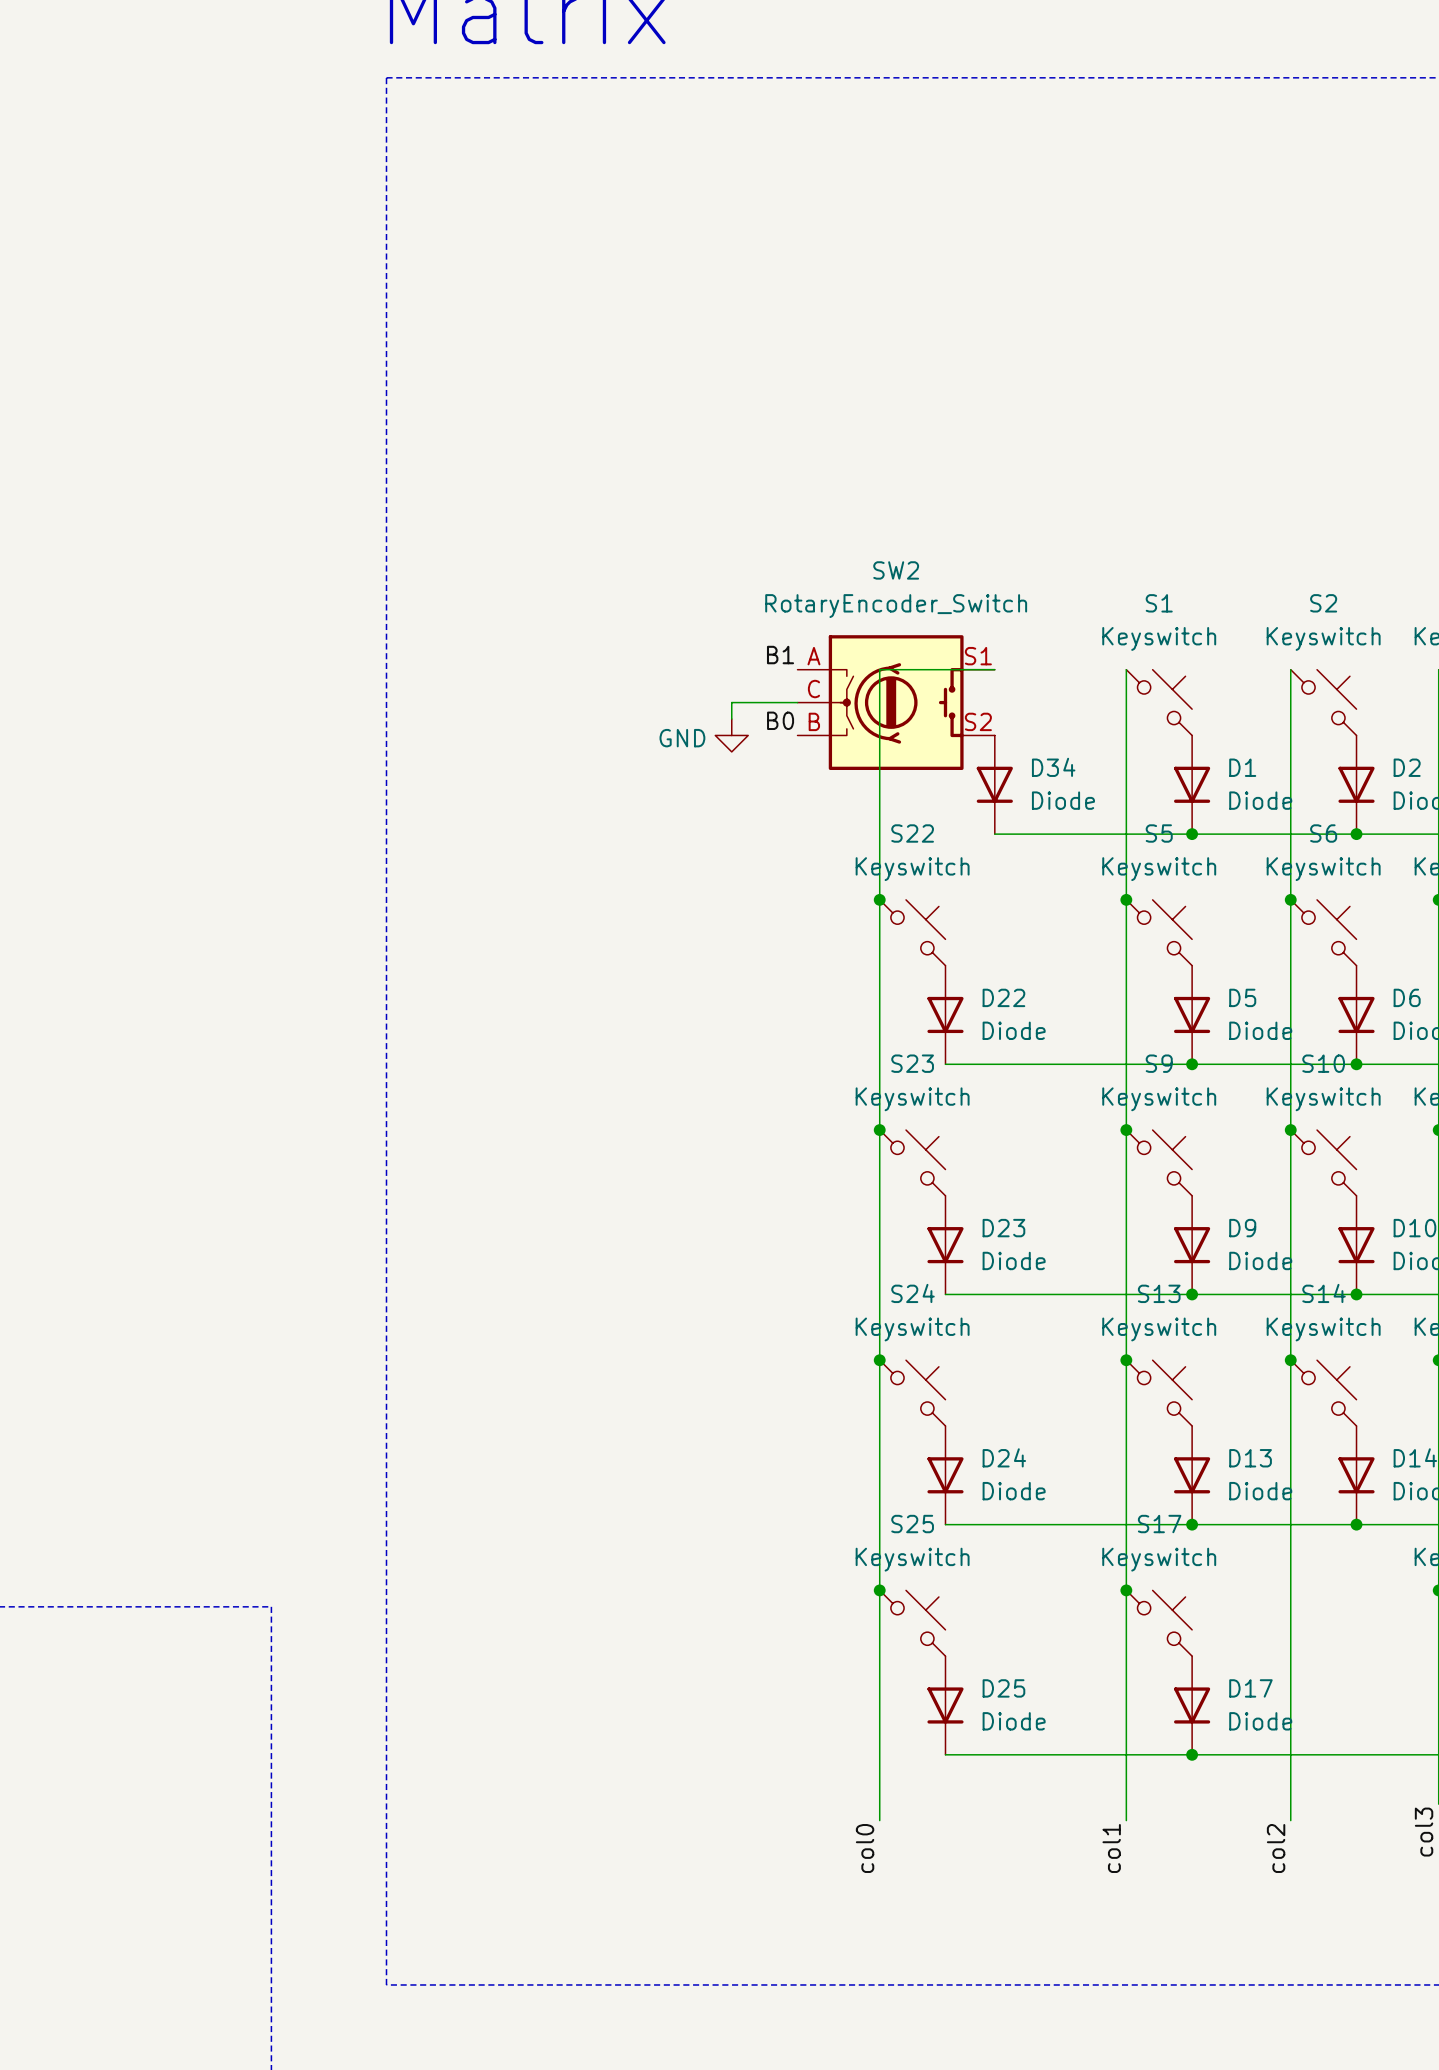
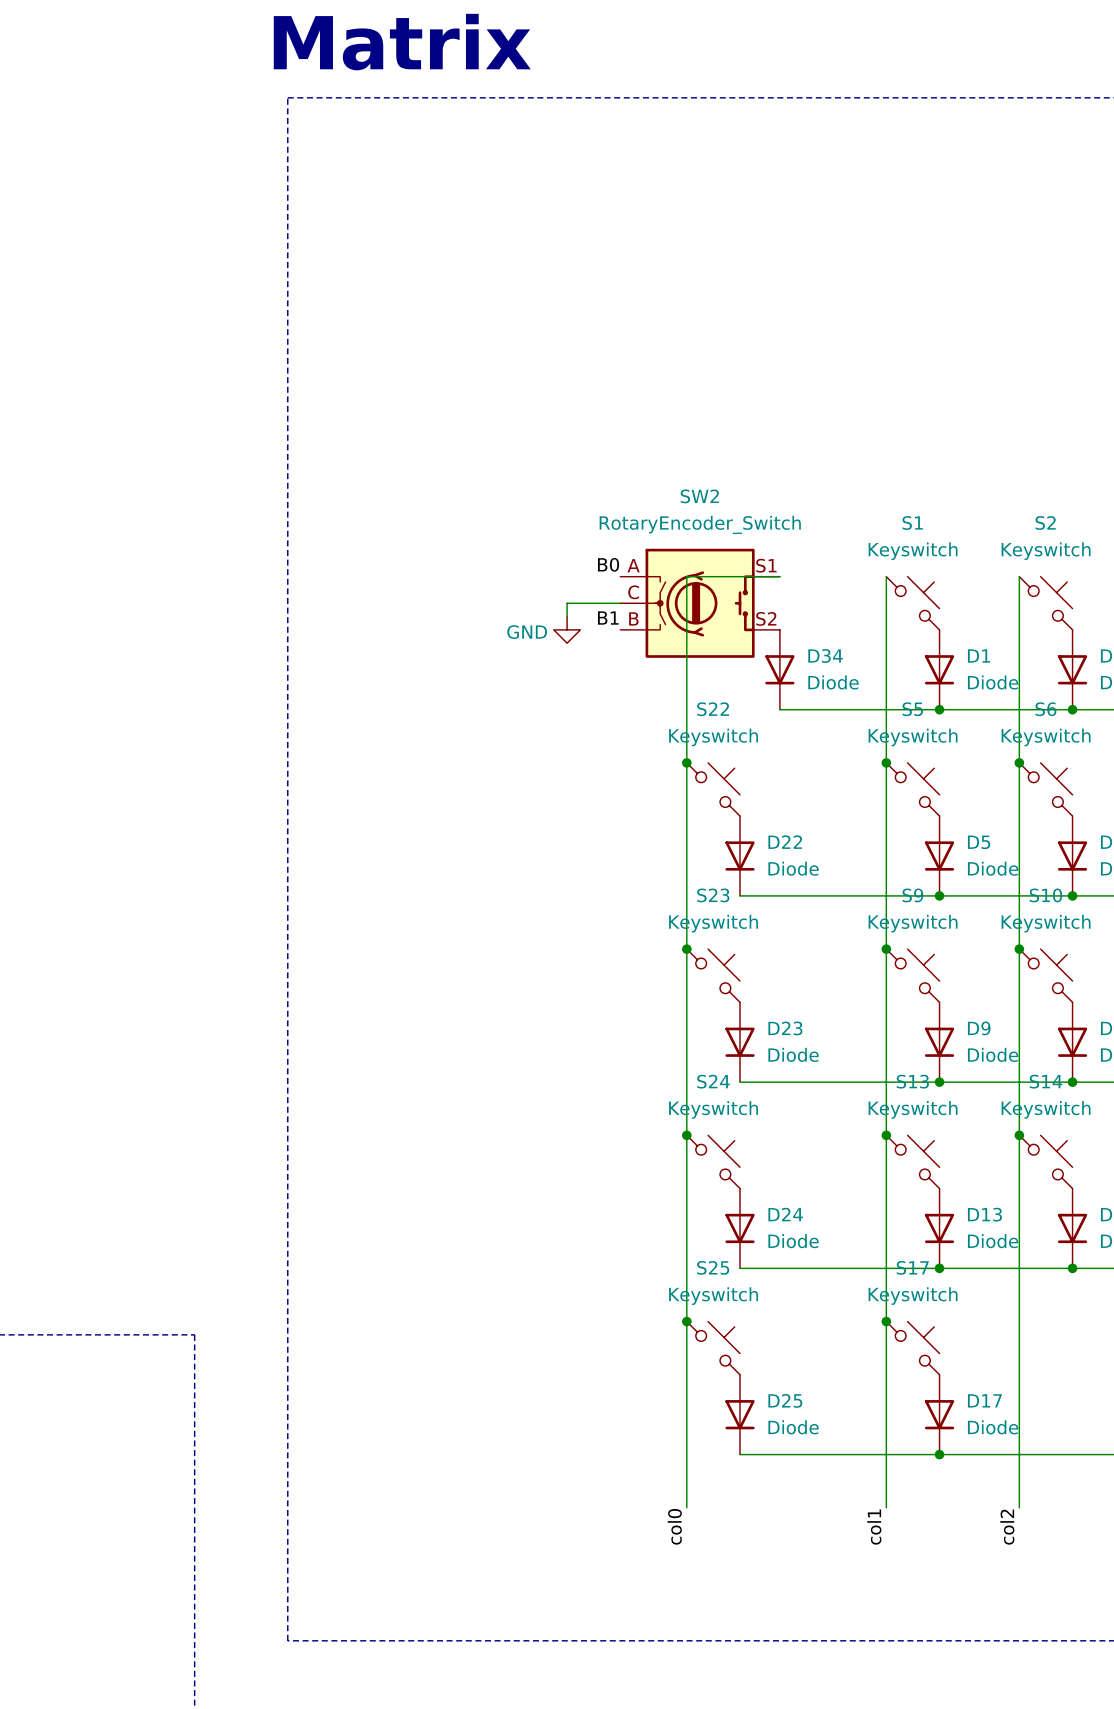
label: B1 (780, 655) -> B0 (608, 564)
label: B0 (780, 720) -> B1 (608, 618)

